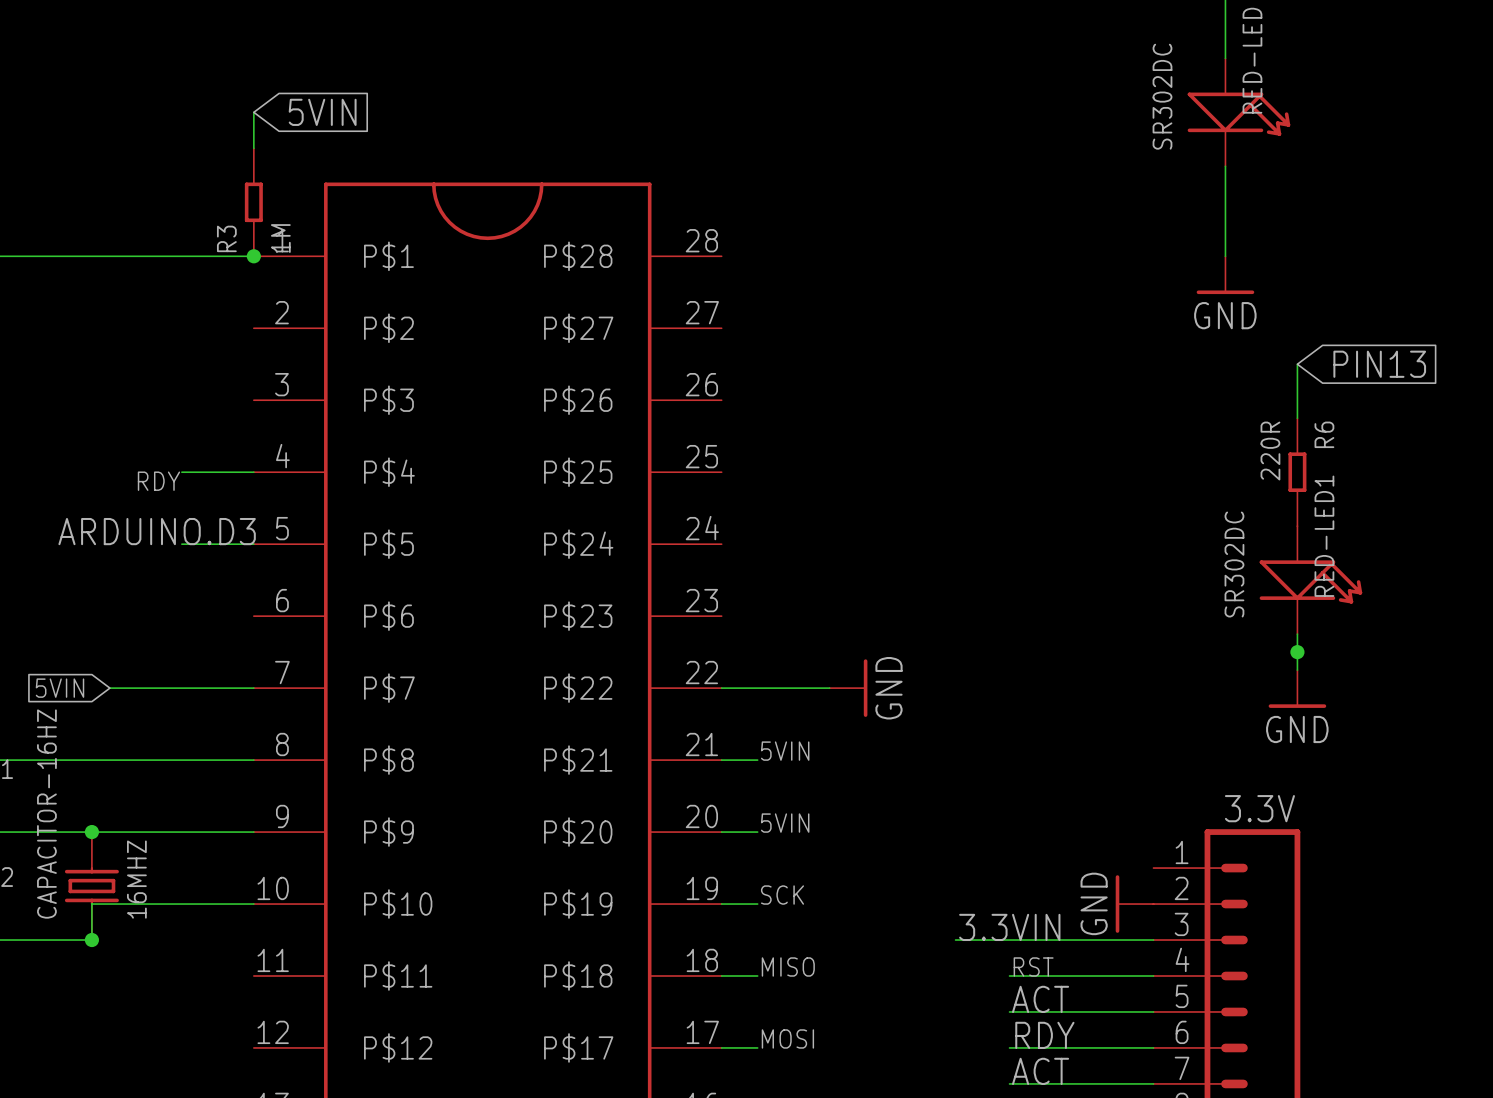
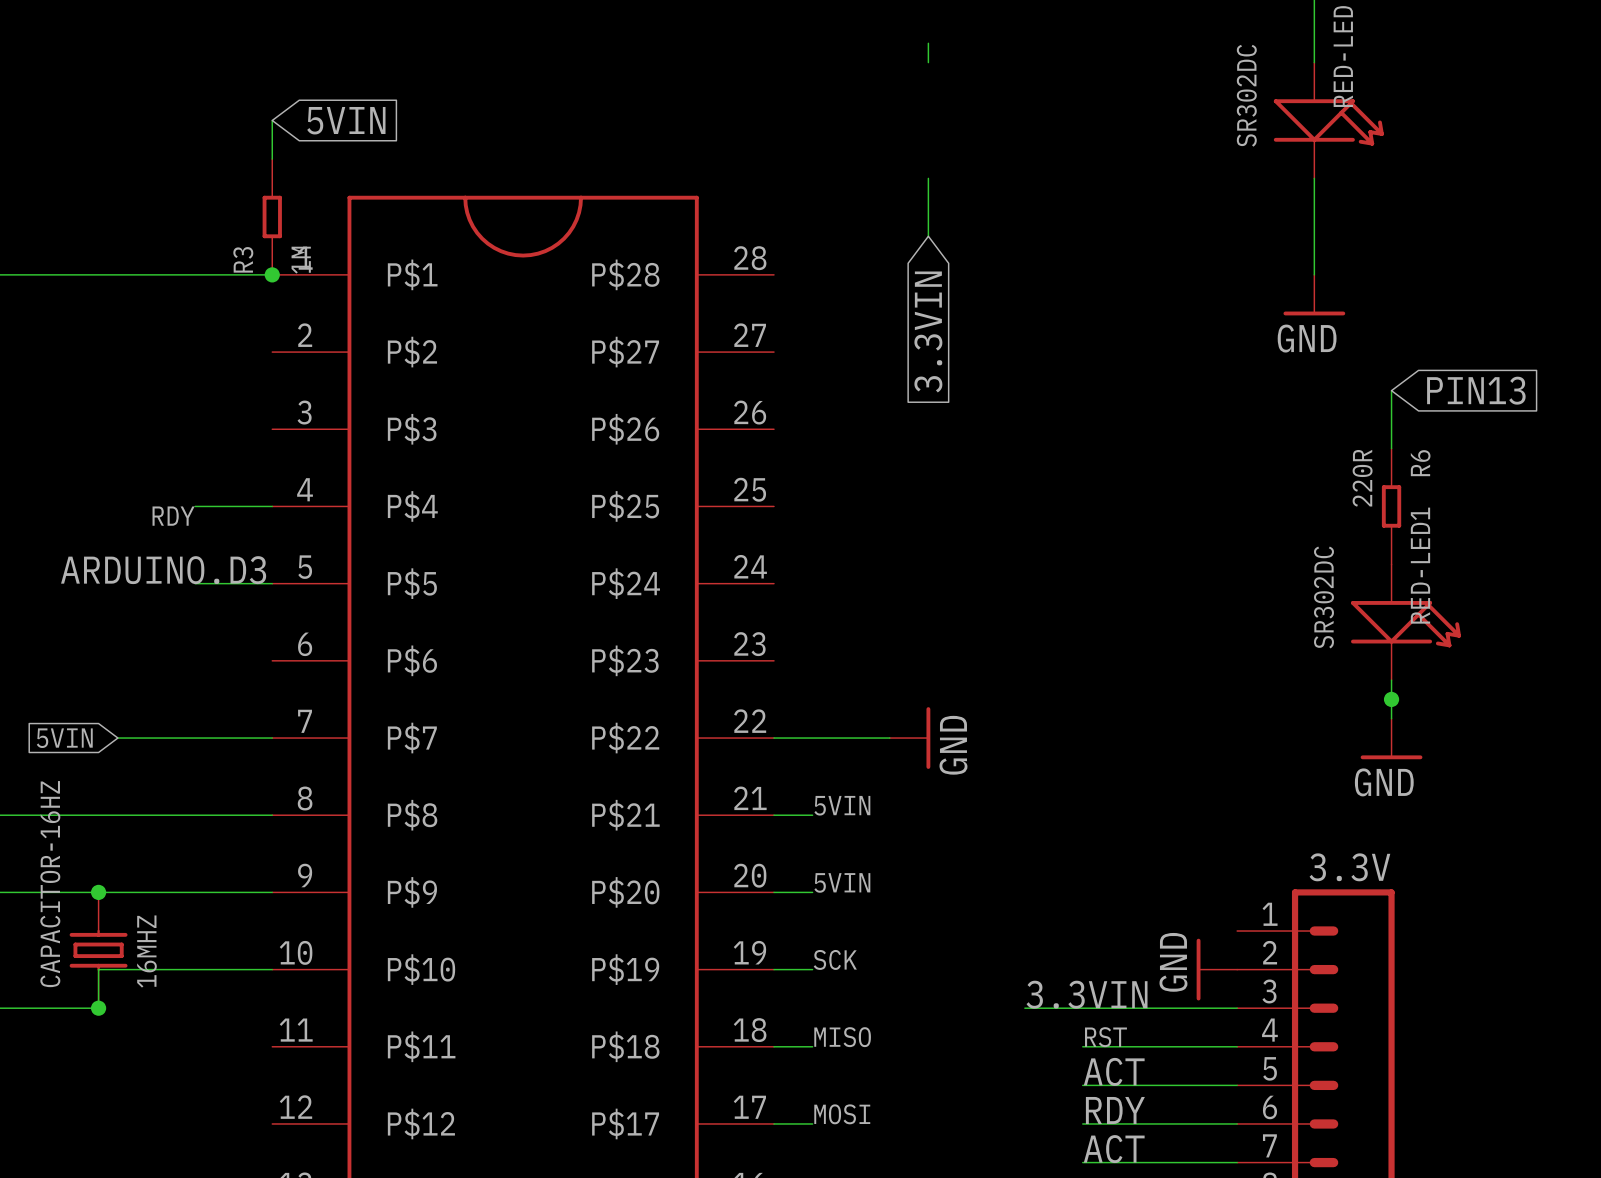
wire: none -> (928, 43) (928, 62)
wire: none -> (928, 178) (928, 236)
global label: none -> 3.3VIN (928, 331)

